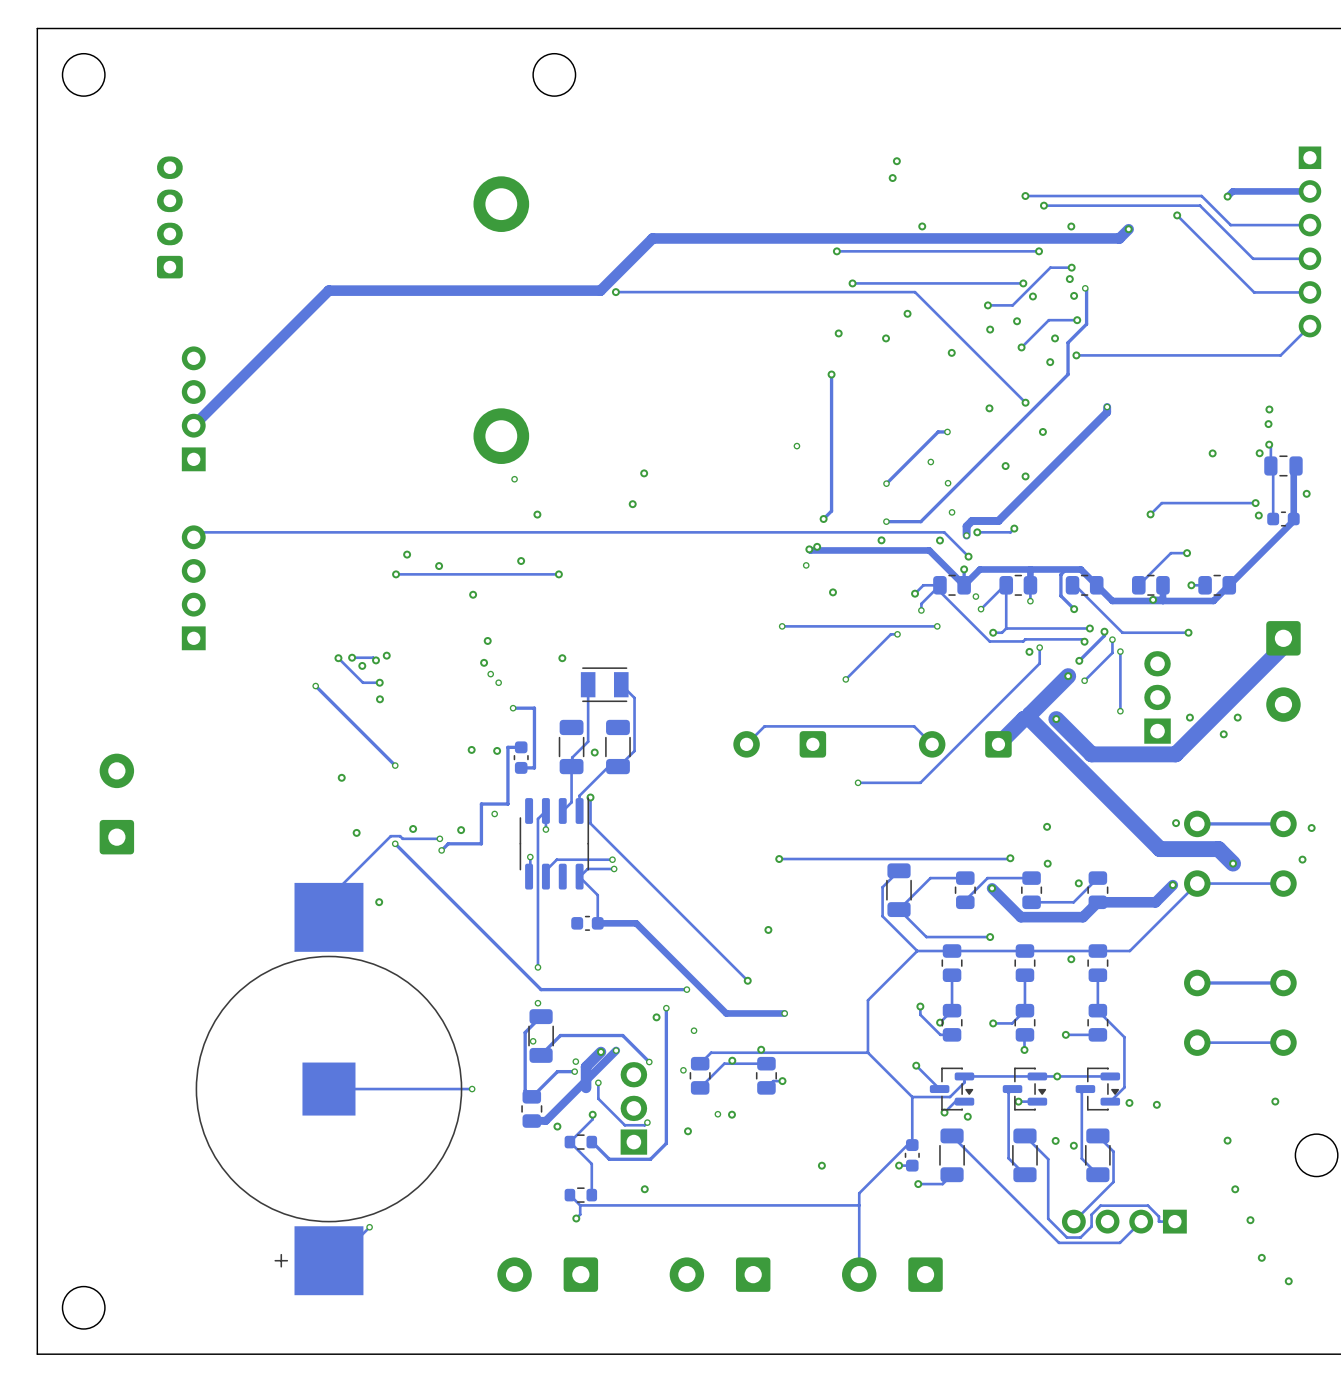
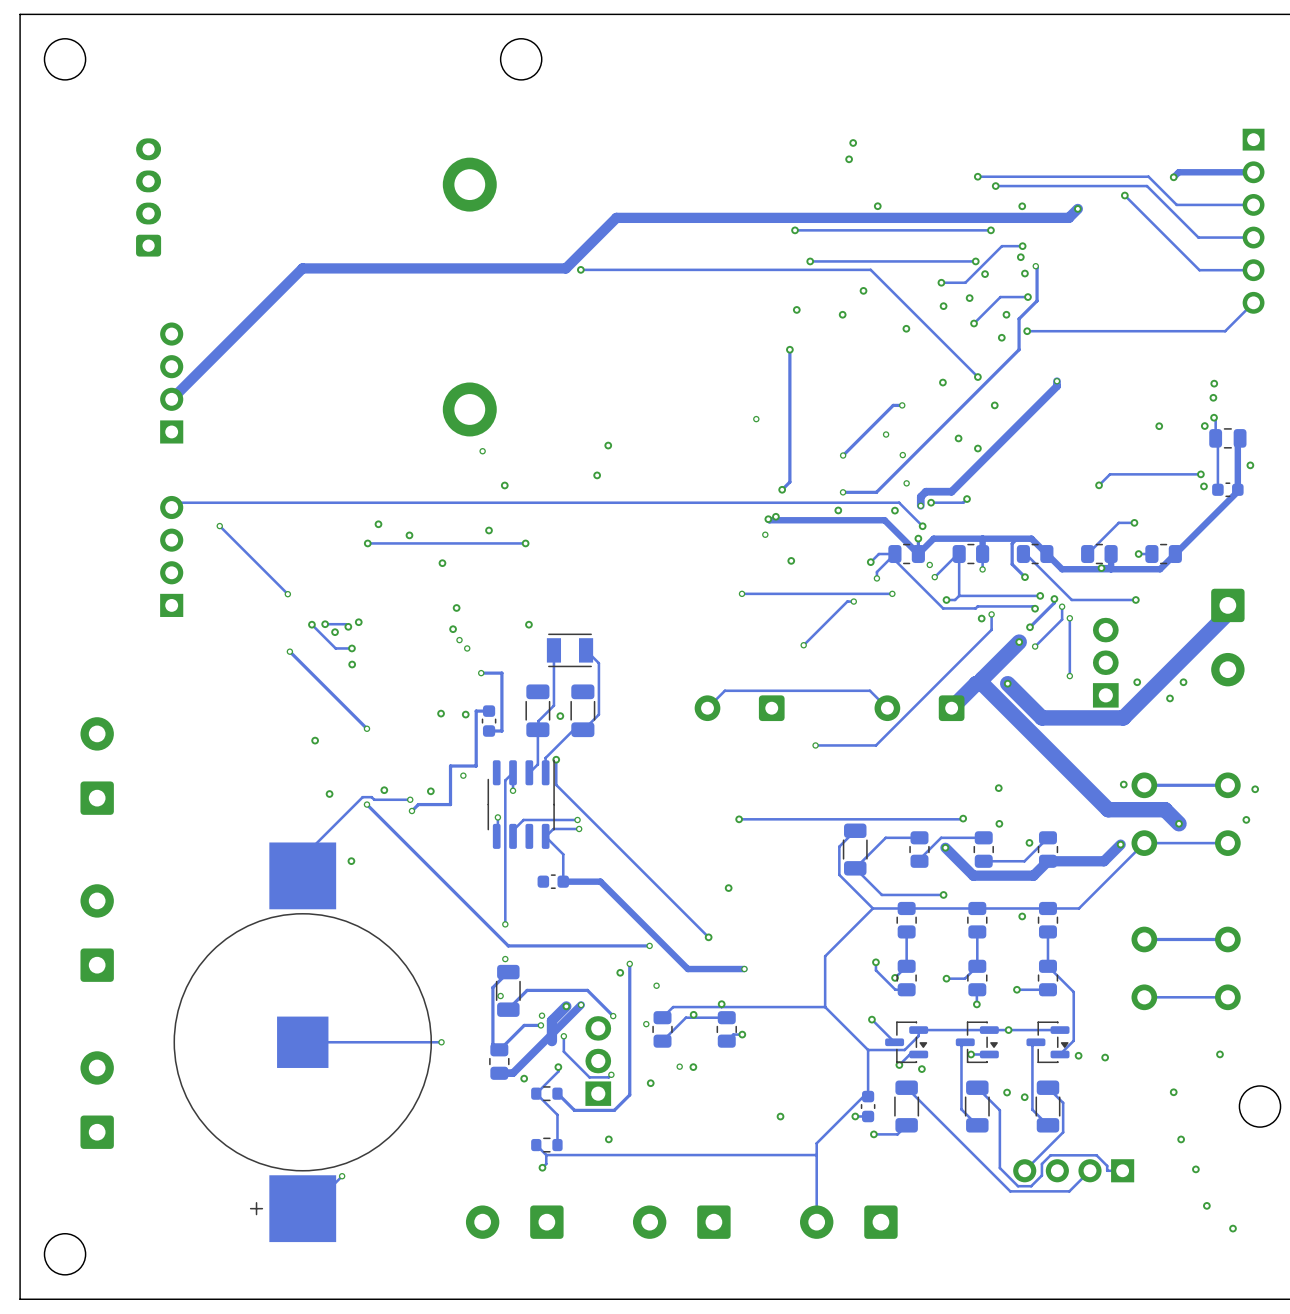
track: none -> (219, 526) (287, 594)
via: none -> (219, 526)
via: none -> (287, 594)
part: none -> (97, 933)
part: none -> (97, 1100)

